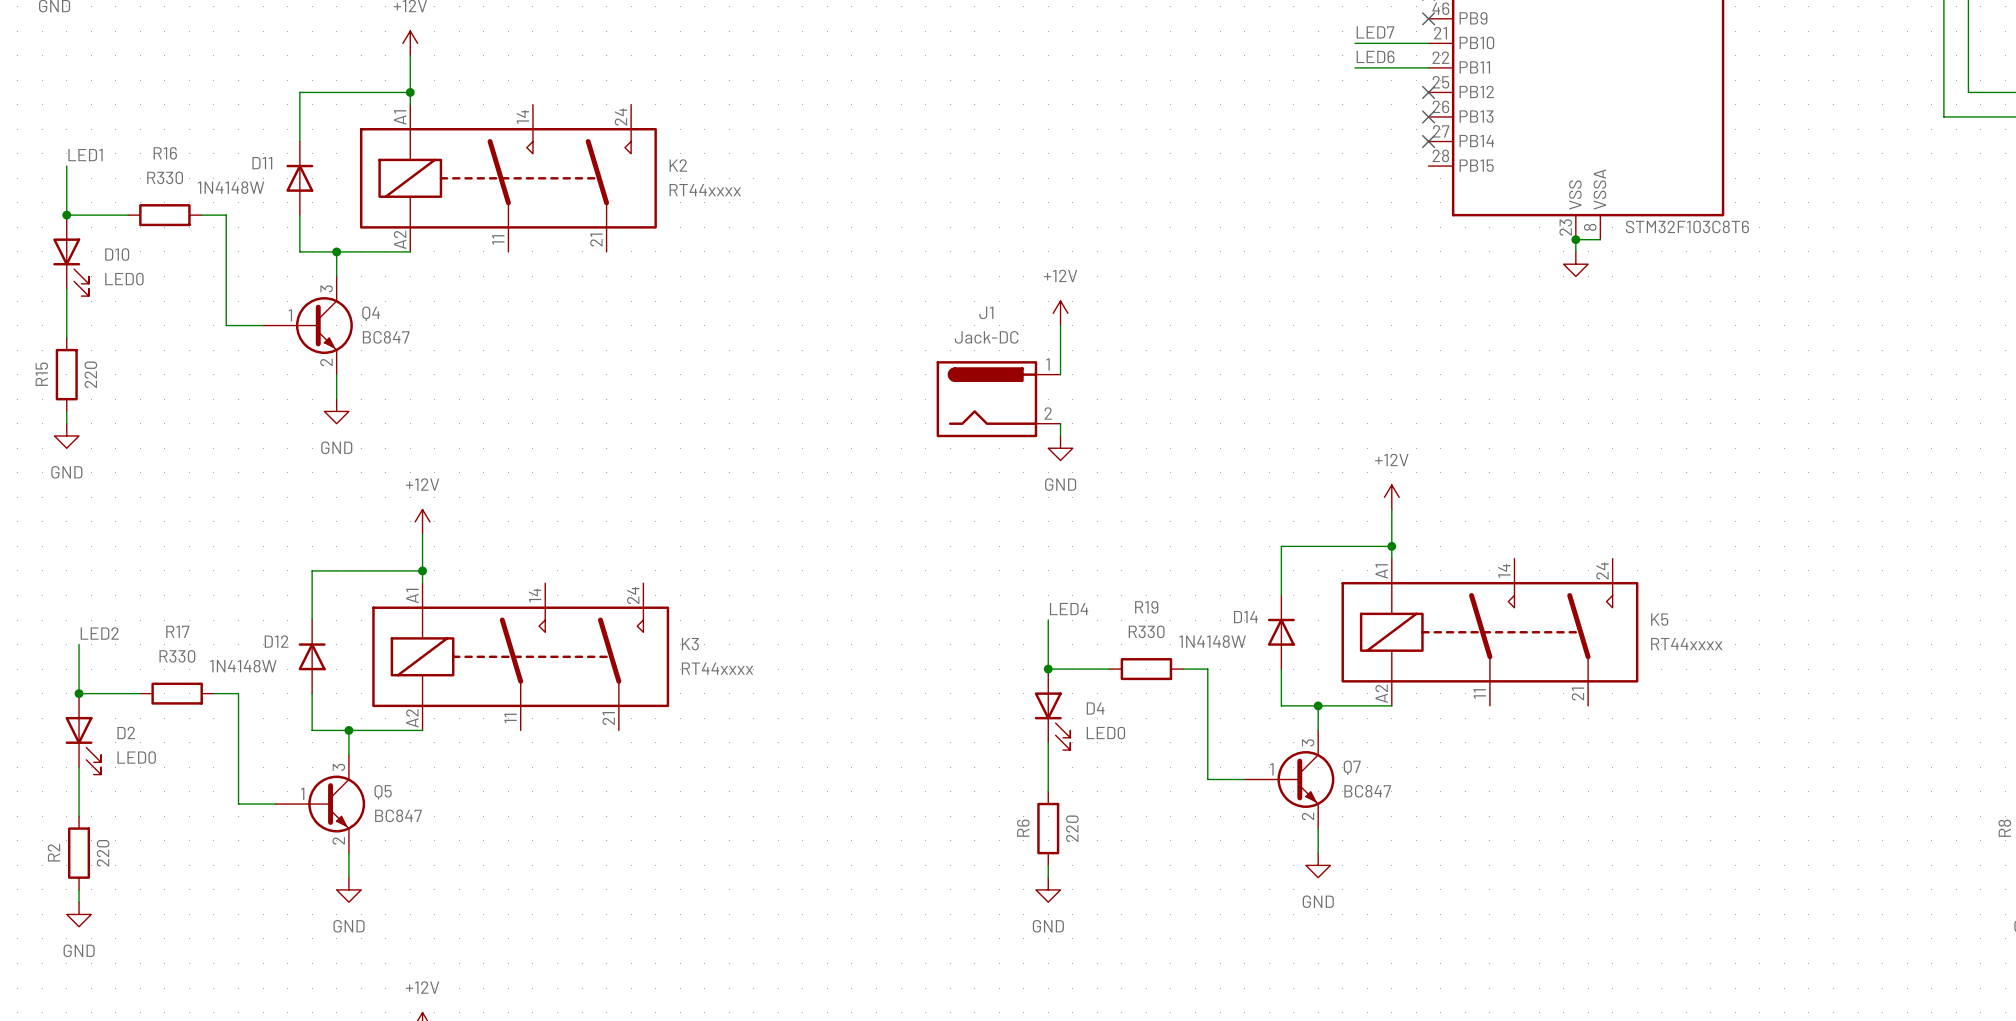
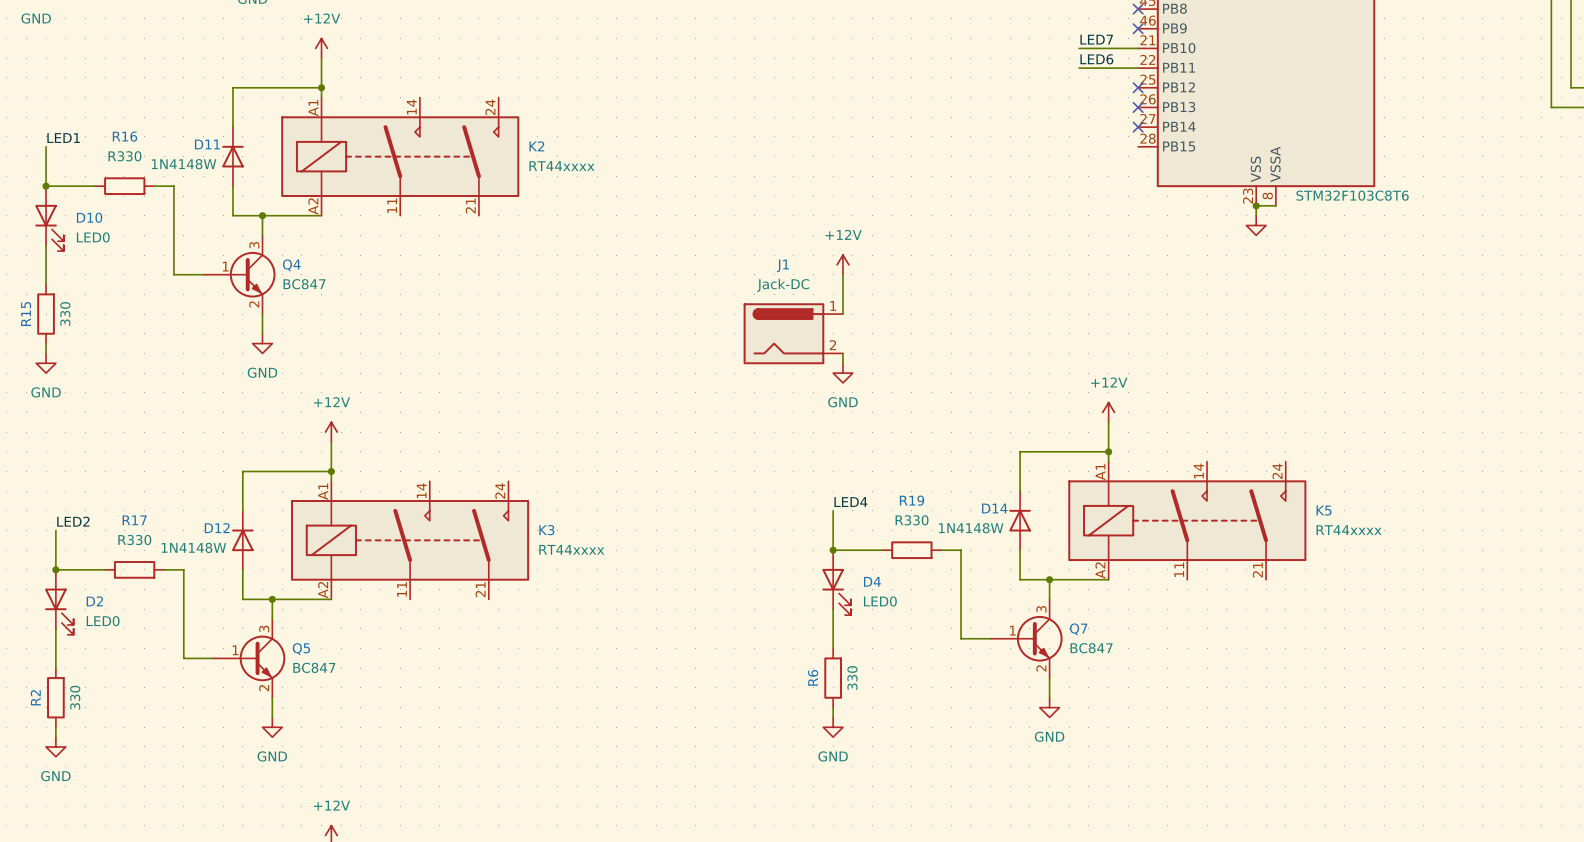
R15 value: 220 (90, 374) -> 330 (65, 314)
R6 value: 220 (1072, 828) -> 330 (852, 678)
R2 value: 220 (103, 853) -> 330 (75, 697)

